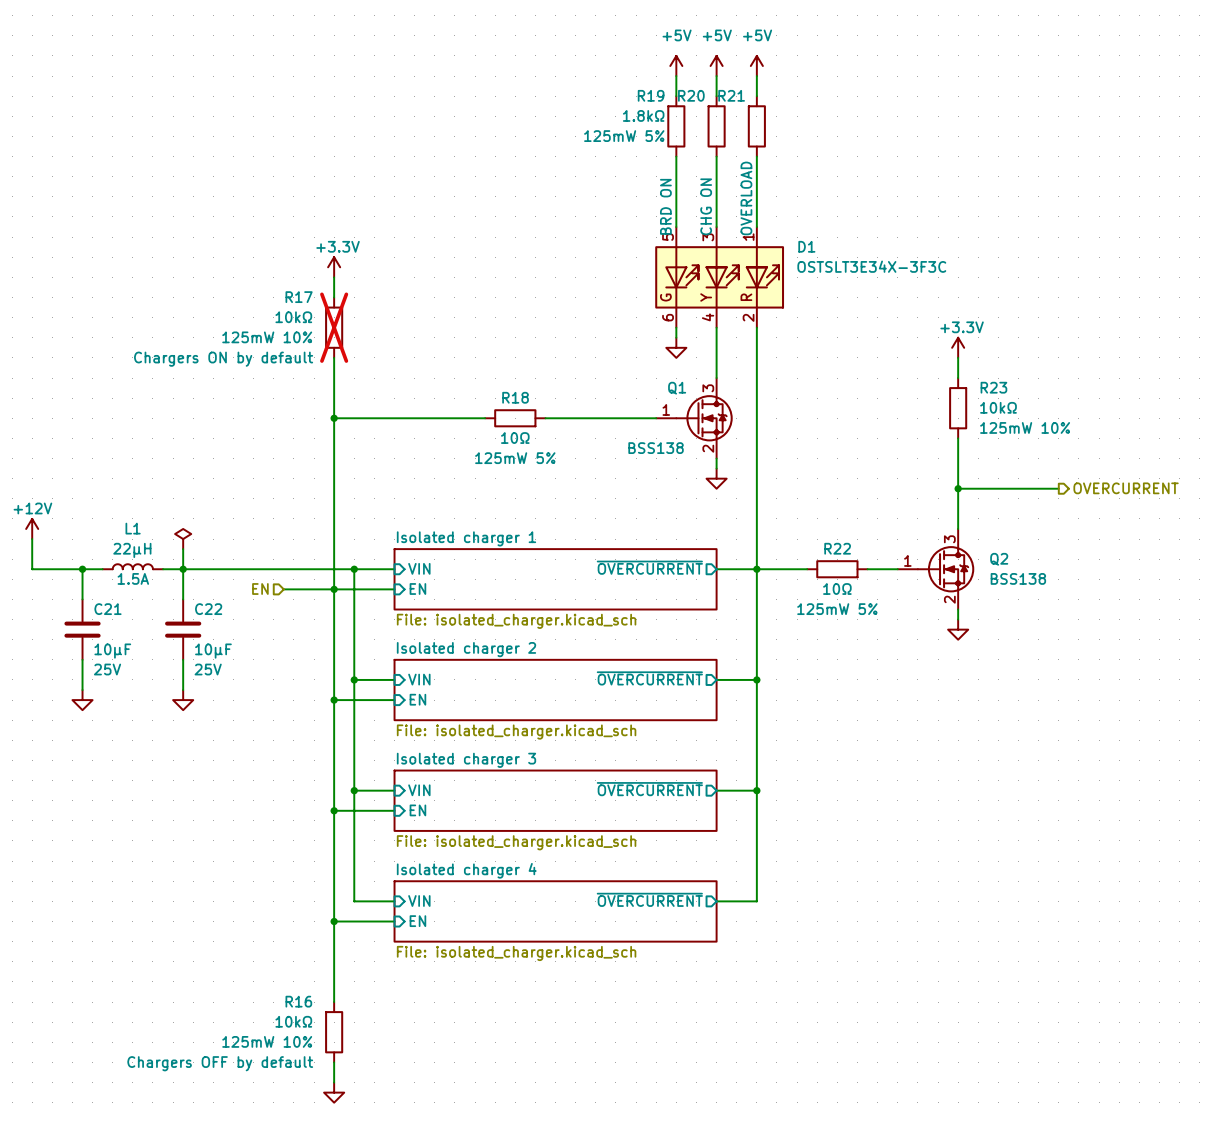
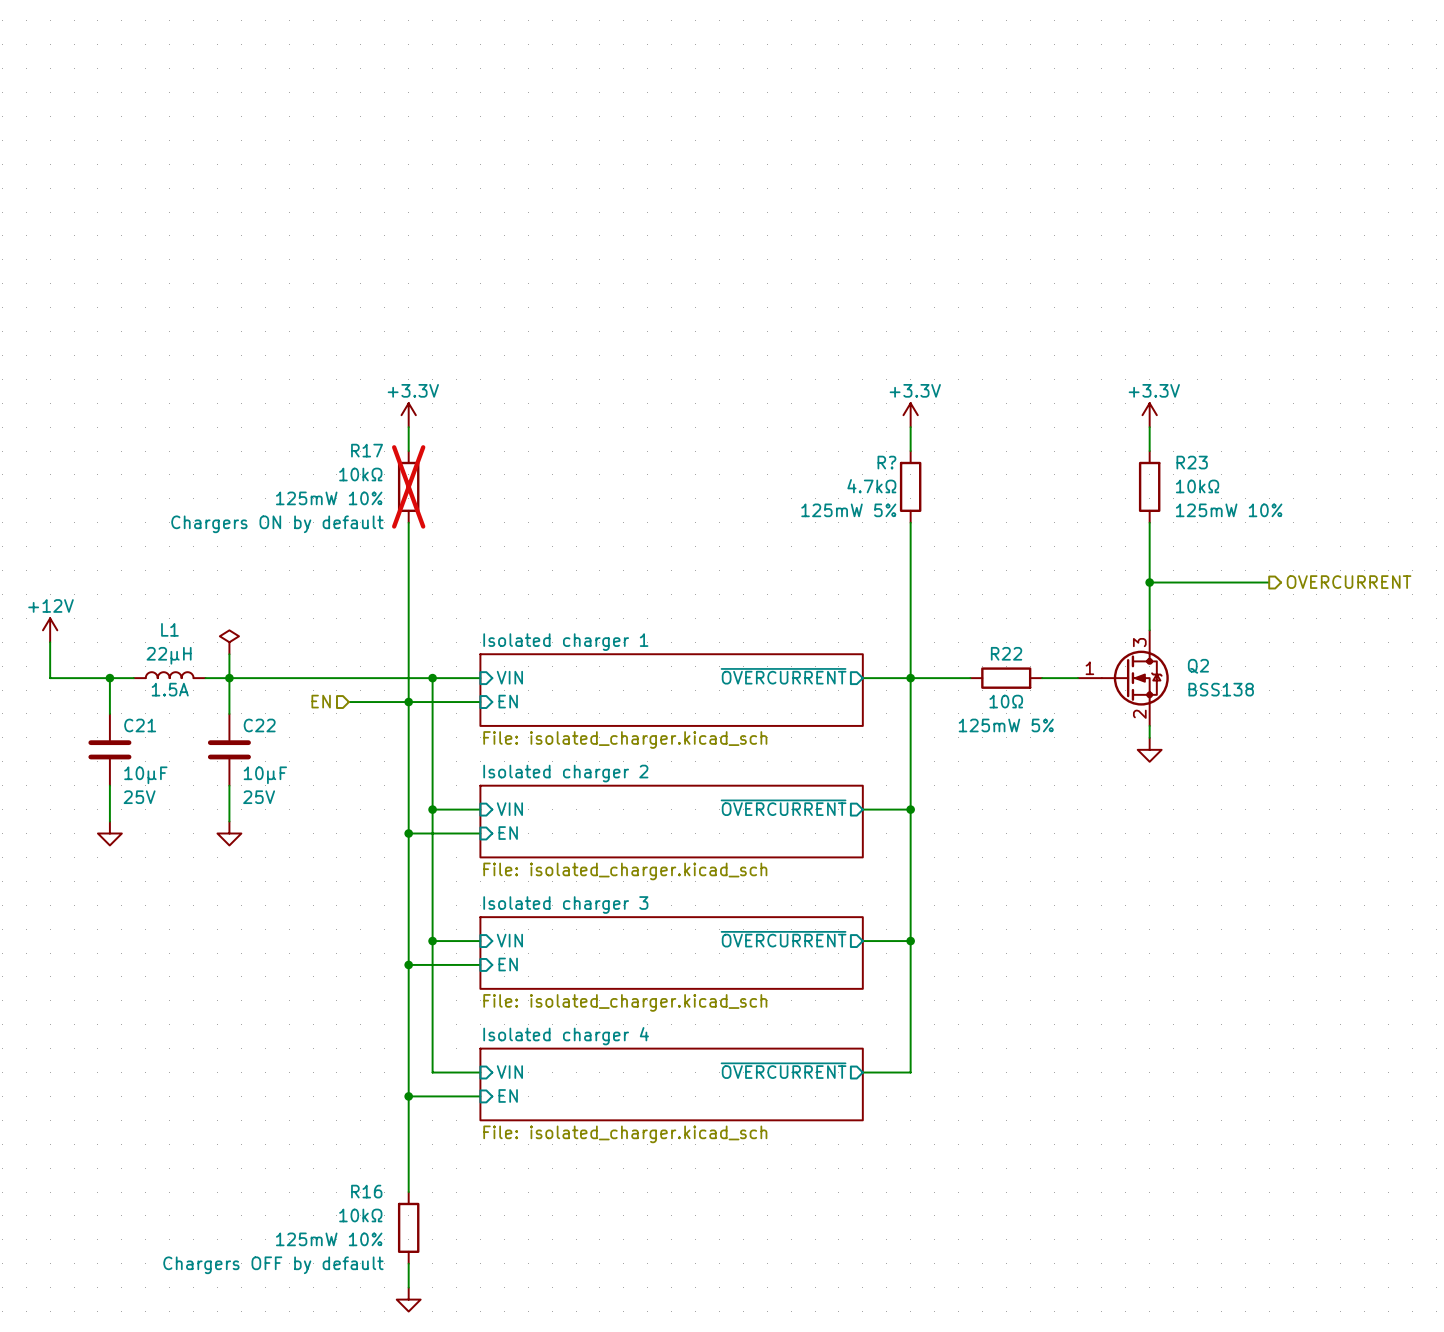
power symbol: +5V (676, 66) -> none
power symbol: +5V (716, 66) -> none
power symbol: +5V (756, 66) -> none
wire: (676, 76) (676, 96) -> none
wire: (716, 76) (716, 96) -> none
wire: (756, 76) (756, 96) -> none
R19: 1.8kΩ (676, 126) -> none
R20: (716, 126) -> none
R21: (756, 126) -> none
wire: (676, 156) (676, 227) -> none
wire: (716, 156) (716, 227) -> none
wire: (756, 156) (756, 227) -> none
power symbol position: +3.3V (334, 267) -> +3.3V (408, 415)
wire: (334, 277) (334, 297) -> none
D1: OSTSLT3E34X-3F3C (719, 277) -> none
R17 position: (334, 327) -> (408, 486)
wire: (676, 327) (676, 337) -> none
wire: (716, 327) (716, 378) -> none
power symbol: (676, 347) -> none
power symbol: none -> +3.3V (910, 415)
wire: (756, 378) (756, 438) -> none
R?: none -> 4.7kΩ (910, 486)
wire: (334, 418) (485, 418) -> none
junction: (334, 418) -> none
R18: 10Ω (515, 418) -> none
wire: (545, 418) (656, 418) -> none
Q1: BSS138 (694, 418) -> none
wire: (716, 458) (716, 468) -> none
power symbol: (716, 478) -> none

